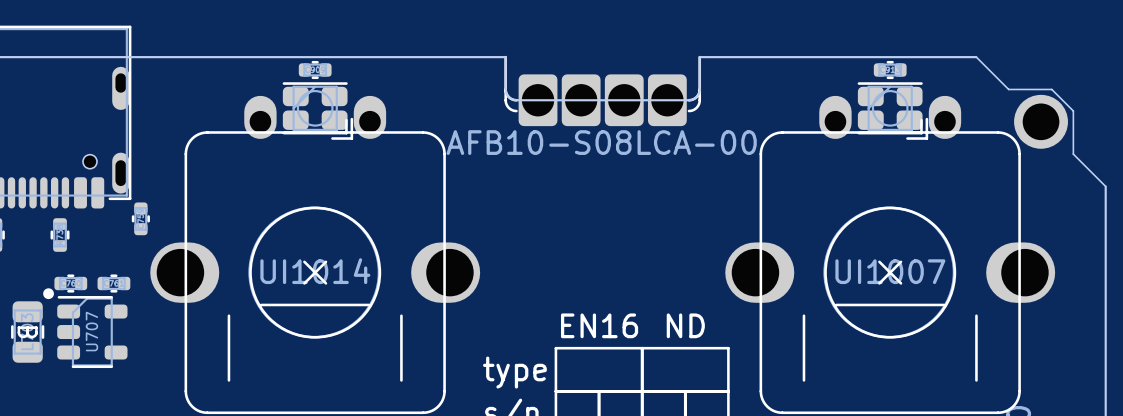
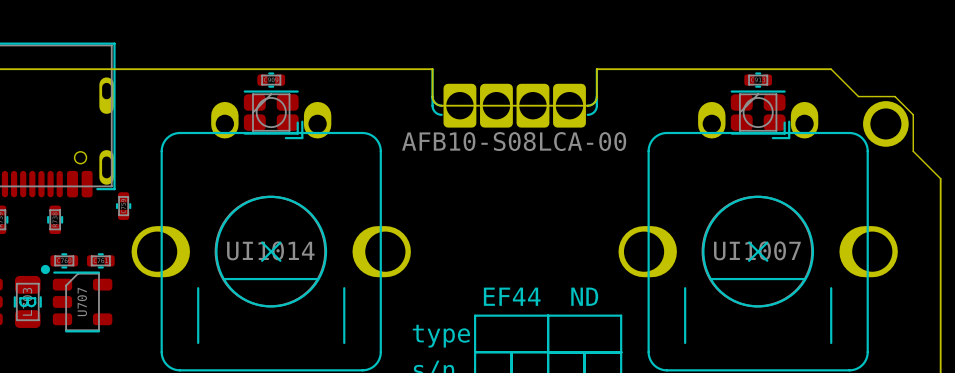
text: EN16 (599, 325) -> EF44 (512, 296)

